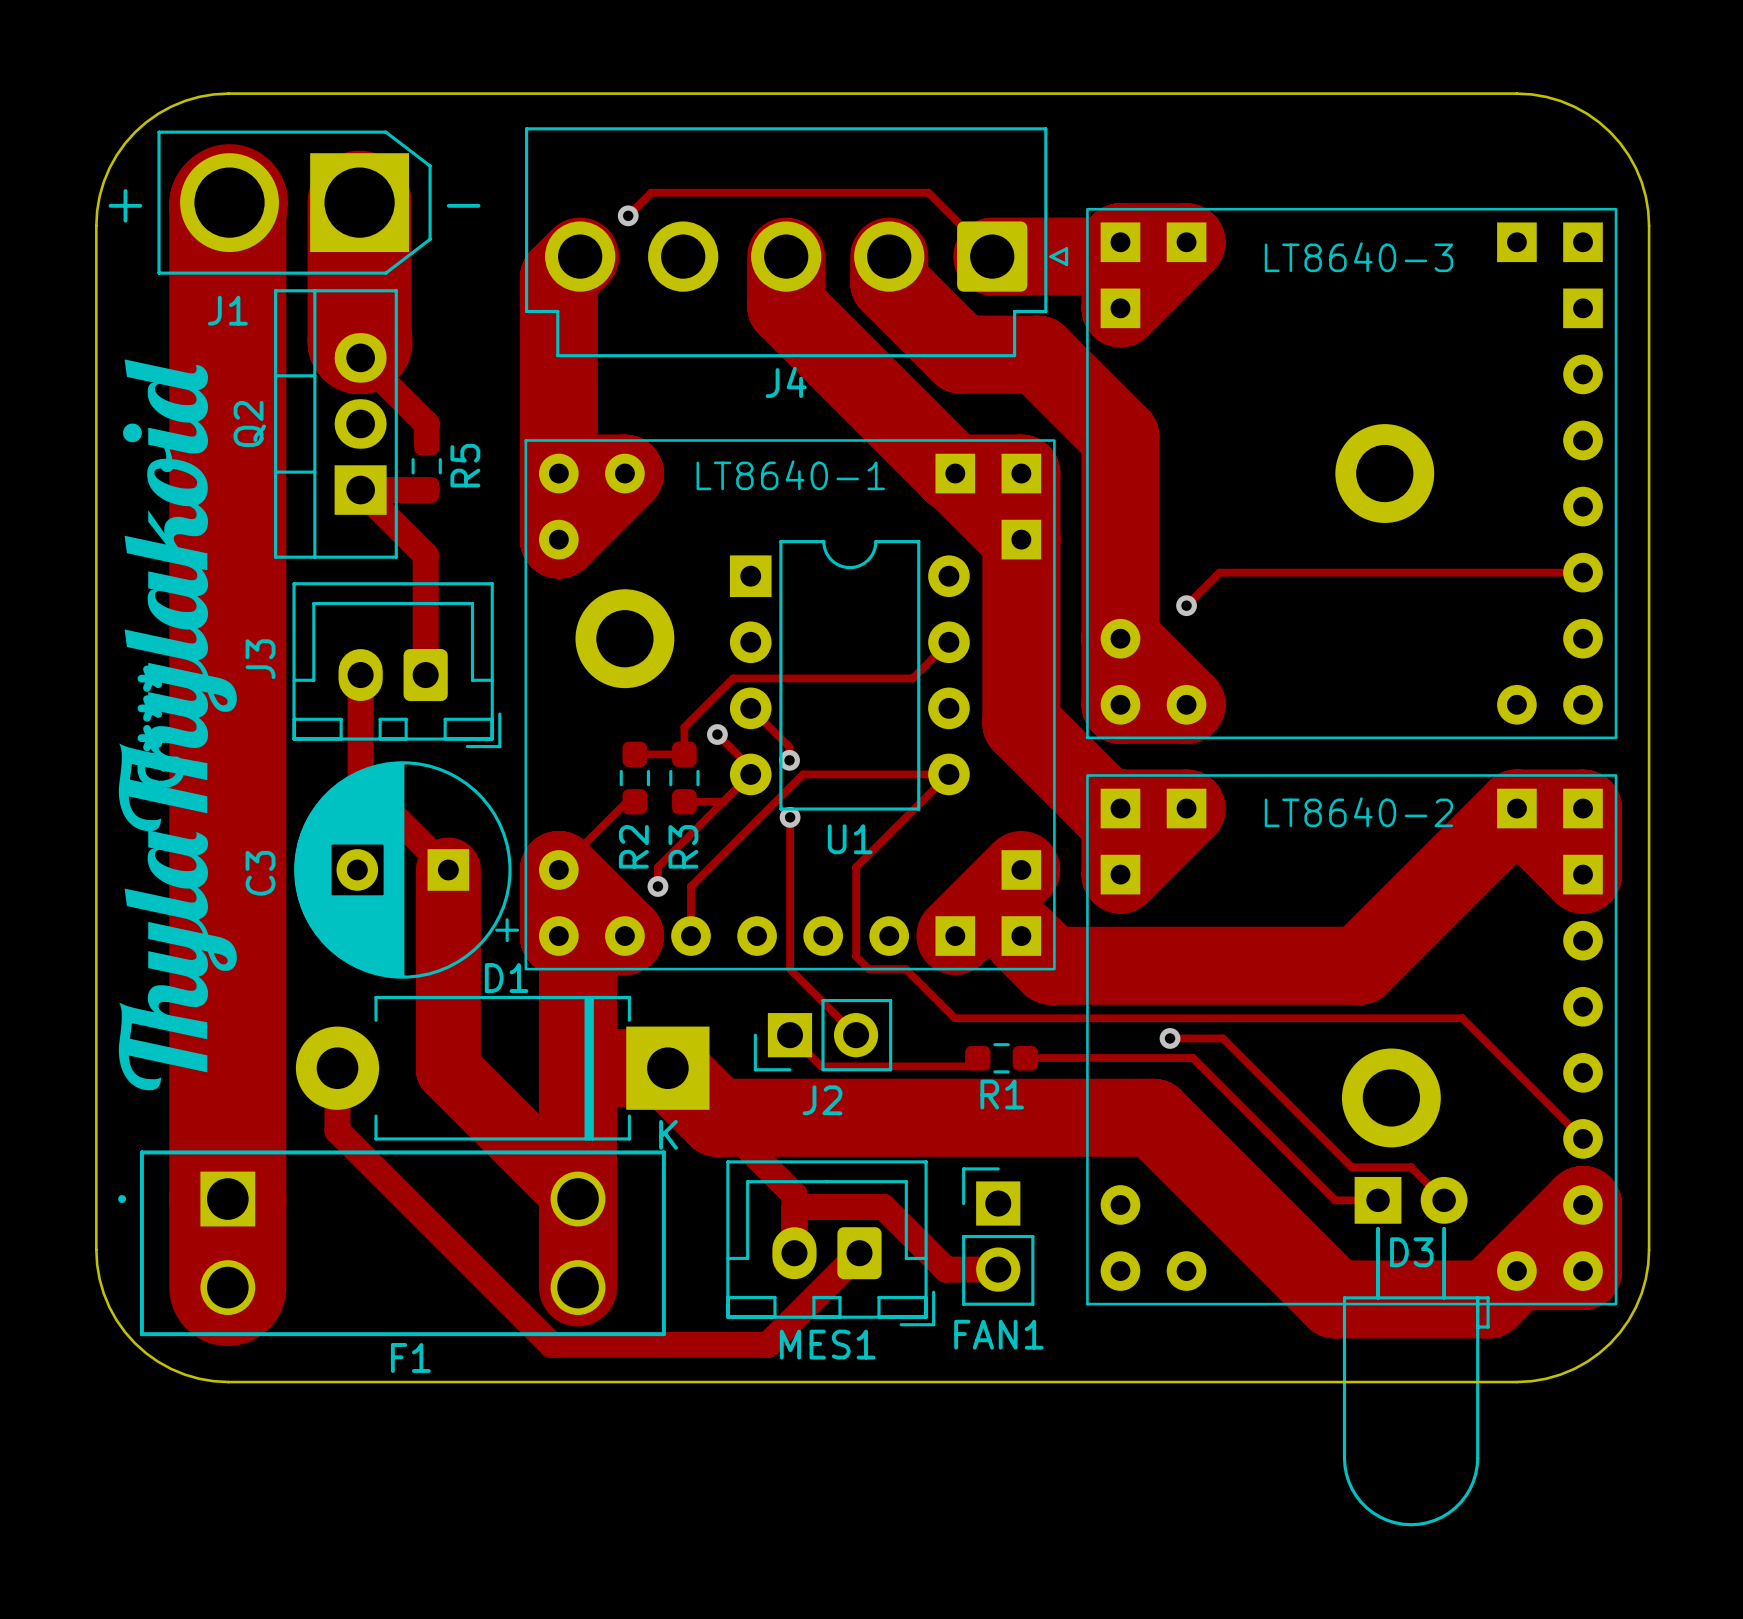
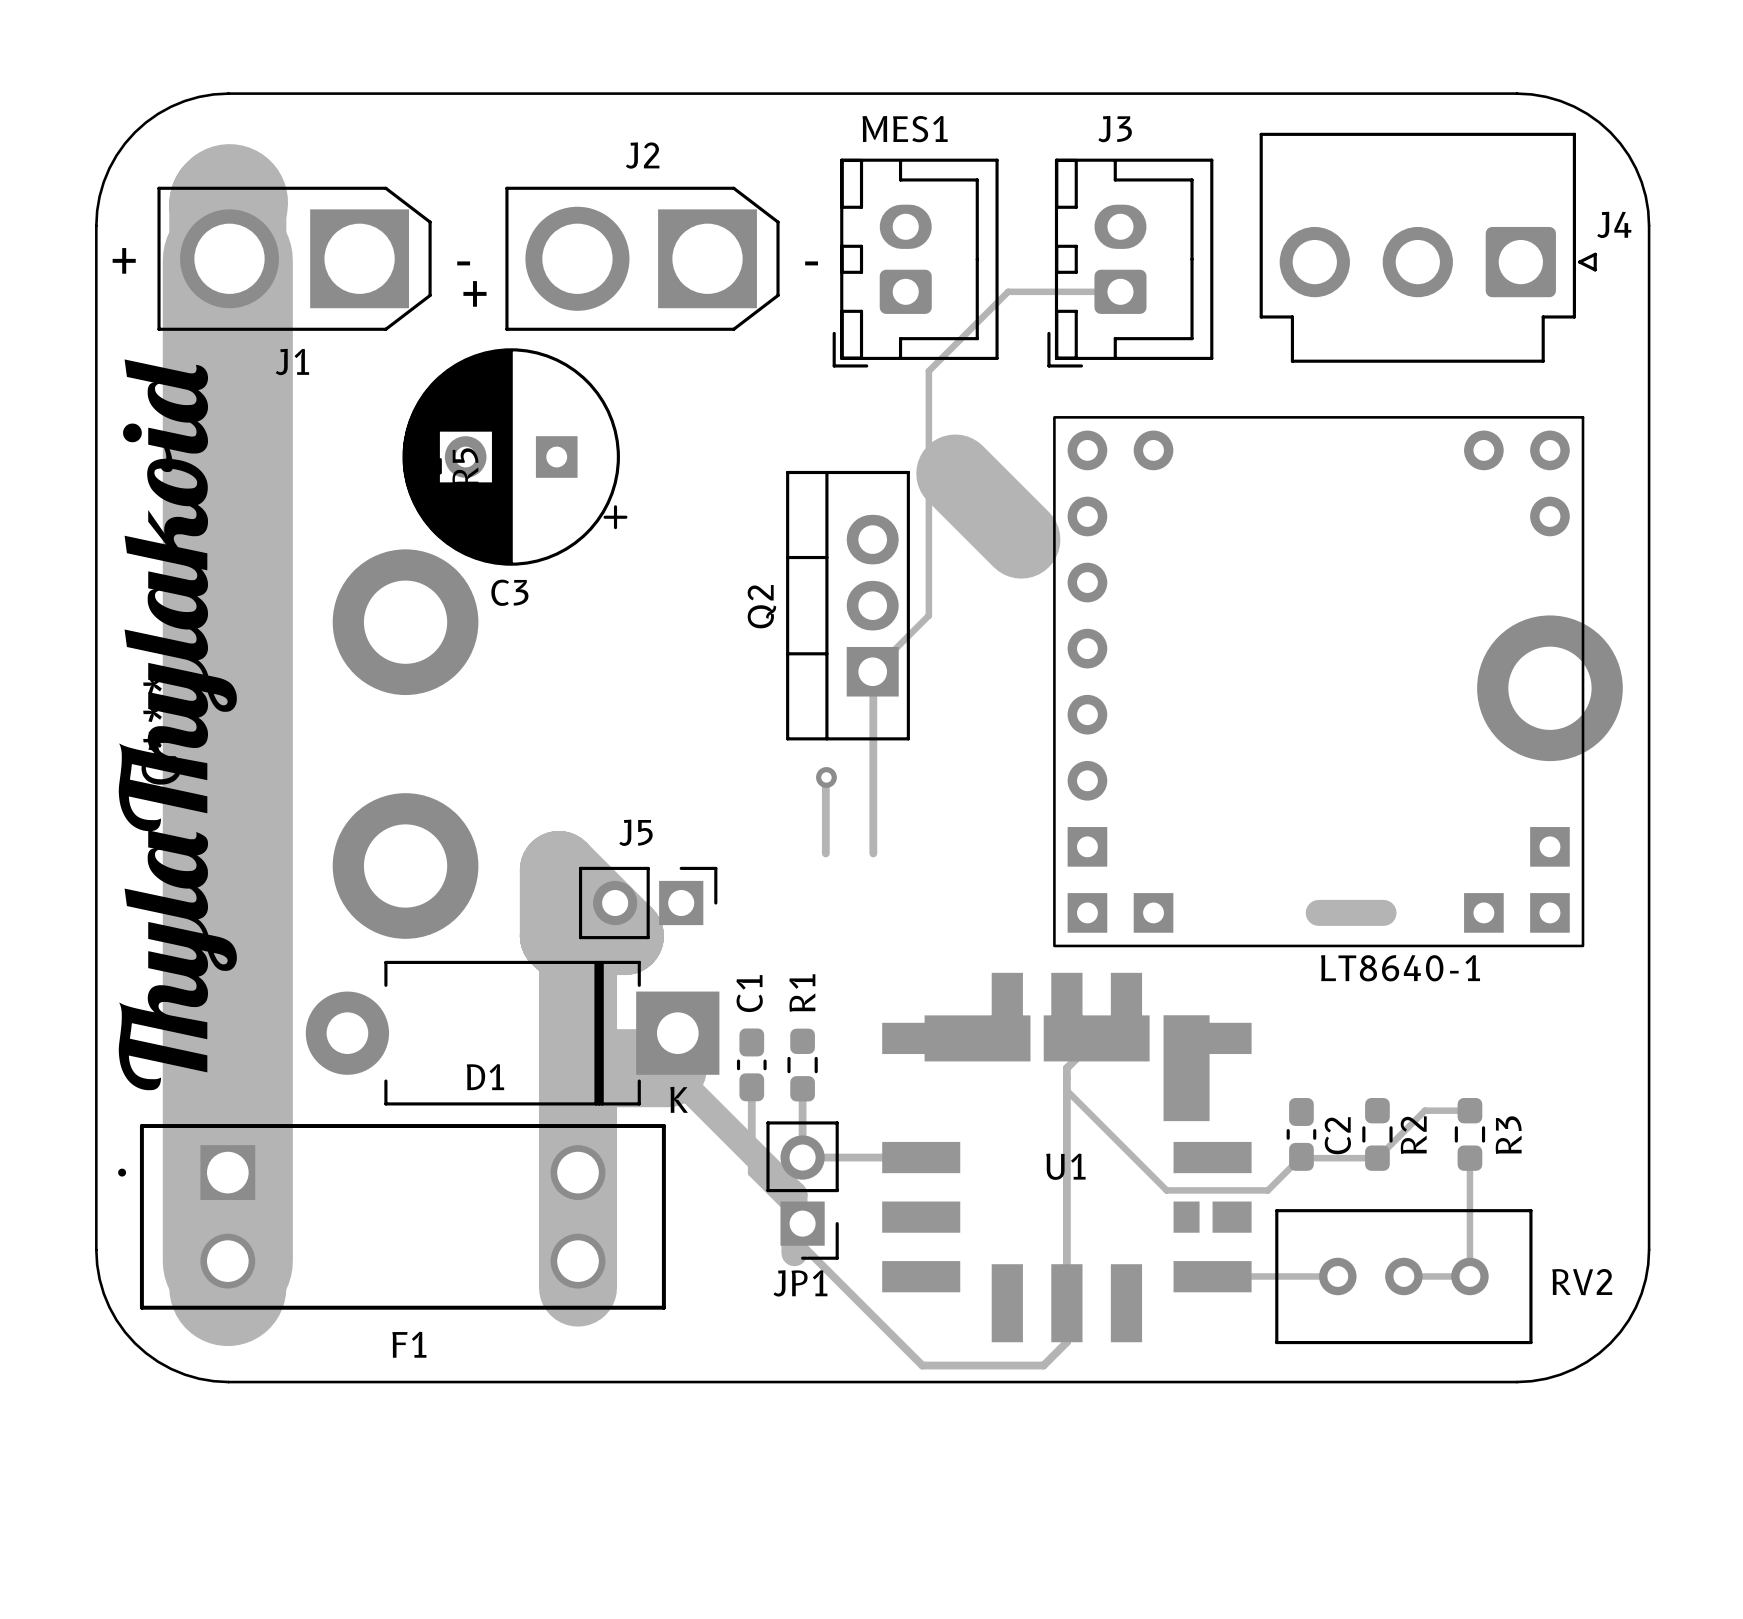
J4 footprint: [525, 127, 1069, 358] -> [1259, 132, 1597, 363]
J1 position: (294, 202) -> (294, 258)
track: (359, 202) (360, 341) -> none
track: (628, 215) (651, 192) (928, 192) (992, 256) (1106, 256) (1120, 242) -> none
via: (628, 215) -> none
track: (1120, 242) (1120, 308) (1186, 242) (1120, 242) -> none
track: (580, 256) (558, 277) (558, 539) (624, 473) (558, 473) -> none
track: (786, 256) (786, 306) (953, 473) (1021, 473) (1021, 723) (1106, 808) (1186, 808) (1120, 874) (1120, 808) -> none
track: (889, 256) (889, 282) (961, 354) (1037, 354) (1120, 437) (1120, 704) (1186, 704) (1120, 638) -> none
track width: thin (227, 260) (227, 1261) -> thick (227, 260) (227, 1261)
track: none -> (1120, 291) (1008, 291) (928, 371) (928, 615) (872, 671) (873, 853)
J1 name position: J1 (227, 310) -> J1 (292, 362)
track: (360, 357) (426, 423) (426, 442) -> none
J4 name position: J4 (786, 382) -> J4 (1614, 224)
Q2 position: (335, 423) -> (848, 605)
LT8640-1 footprint: [524, 439, 1056, 971] -> [1053, 416, 1585, 948]
LT8640-3: (1351, 473) -> none
part: (1384, 473) -> none
LT8640-1 name position: LT8640-1 (790, 475) -> LT8640-1 (1400, 968)
track: (426, 490) (360, 490) (425, 555) (425, 675) -> none
U1 footprint: [729, 540, 970, 811] -> [882, 972, 1252, 1343]
track: (1583, 572) (1219, 572) (1186, 605) -> none
via: (1186, 605) -> none
part: none -> (405, 622)
part: (624, 638) -> none
track: (948, 642) (912, 678) (733, 678) (684, 727) (684, 754) (634, 754) -> none
J3 rotation: 0° (396, 665) -> 90° clockwise (1130, 263)
J3 position: (396, 665) -> (1130, 263)
track: (360, 675) (360, 782) (448, 869) (448, 1069) (578, 1199) -> none
part: none -> (1549, 688)
track: (750, 708) (789, 747) (789, 760) -> none
track: (717, 734) (750, 767) (750, 774) (657, 867) (657, 886) -> none
via: (717, 734) -> none
via: (789, 760) -> none
track: none -> (826, 777) (825, 853)
via: none -> (826, 777)
R2 position: (634, 778) -> (1377, 1134)
R3 position: (684, 778) -> (1469, 1134)
track: (634, 801) (627, 801) (558, 869) -> none
track: (684, 801) (723, 801) -> none
track: (1516, 808) (1583, 808) (1583, 874) (1516, 808) -> none
track: (1516, 808) (1359, 965) (1051, 965) (1021, 936) -> none
track: (790, 817) (790, 969) (856, 1035) -> none
via: (790, 817) -> none
U1 name position: U1 (850, 839) -> U1 (1065, 1166)
R2 name position: R2 (633, 846) -> R2 (1413, 1135)
R3 name position: R3 (683, 846) -> R3 (1508, 1135)
part: none -> (405, 866)
C3 position: (406, 869) -> (514, 457)
track: (1021, 869) (955, 936) -> none
C3 name rotation: 0° (260, 873) -> 90° clockwise (509, 592)
C3 name position: C3 (260, 873) -> C3 (509, 592)
via: (657, 886) -> none
J5: none -> (648, 903)
track: none -> (1318, 912) (1383, 912)
track: (691, 936) (691, 886) (803, 774) (948, 774) (856, 867) (856, 956) (868, 969) (905, 969) (954, 1018) (1462, 1018) (1583, 1138) -> none
D1 name position: D1 (506, 978) -> D1 (485, 1077)
J2 footprint: [753, 999, 893, 1072] -> [505, 186, 780, 331]
track: (789, 1035) (821, 1066) (969, 1066) (977, 1058) -> none
track: none -> (1096, 1038) (1066, 1068) (1066, 1342) (1043, 1365) (922, 1365) (802, 1245) (802, 1223) (751, 1172) (751, 1087)
track: (1170, 1038) (1222, 1038) (1351, 1167) (1411, 1167) (1444, 1200) -> none
via: (1170, 1038) -> none
LT8640-2: (1351, 1039) -> none
track: (1025, 1057) (1192, 1057) (1335, 1200) (1378, 1200) -> none
R1 rotation: 0° (1001, 1058) -> 90° clockwise (802, 1065)
R1 position: (1001, 1058) -> (802, 1065)
C1: none -> (751, 1064)
track: (337, 1068) (337, 1130) (551, 1344) (767, 1344) (859, 1253) -> none
D1 position: (502, 1068) -> (512, 1033)
track: (667, 1068) (717, 1117) (1153, 1117) (1335, 1299) (1488, 1299) (1583, 1204) (1583, 1271) (1516, 1271) -> none
track: none -> (1066, 1078) (1066, 1090) (1166, 1190) (1267, 1190) (1301, 1156) (1377, 1158) (1424, 1110) (1469, 1110)
track: none -> (802, 1088) (802, 1157) (921, 1157)
R1 name position: R1 (1002, 1094) -> R1 (802, 993)
part: (1391, 1097) -> none
J2 name position: J2 (822, 1100) -> J2 (642, 155)
C2: none -> (1301, 1134)
track: none -> (1469, 1158) (1469, 1276) (1403, 1276)
JP1: none -> (802, 1190)
track: (794, 1208) (796, 1206) (883, 1206) (946, 1269) (998, 1269) -> none
FAN1: (998, 1236) -> none
F1 position: (392, 1243) -> (392, 1216)
MES1 rotation: 0° (830, 1243) -> 90° clockwise (915, 263)
MES1 position: (830, 1243) -> (915, 263)
track: none -> (1212, 1276) (1337, 1276)
RV2: none -> (1403, 1276)
MES1 name position: MES1 (827, 1344) -> MES1 (905, 129)
D3: (1416, 1351) -> none
F1 name position: F1 (410, 1357) -> F1 (409, 1344)

